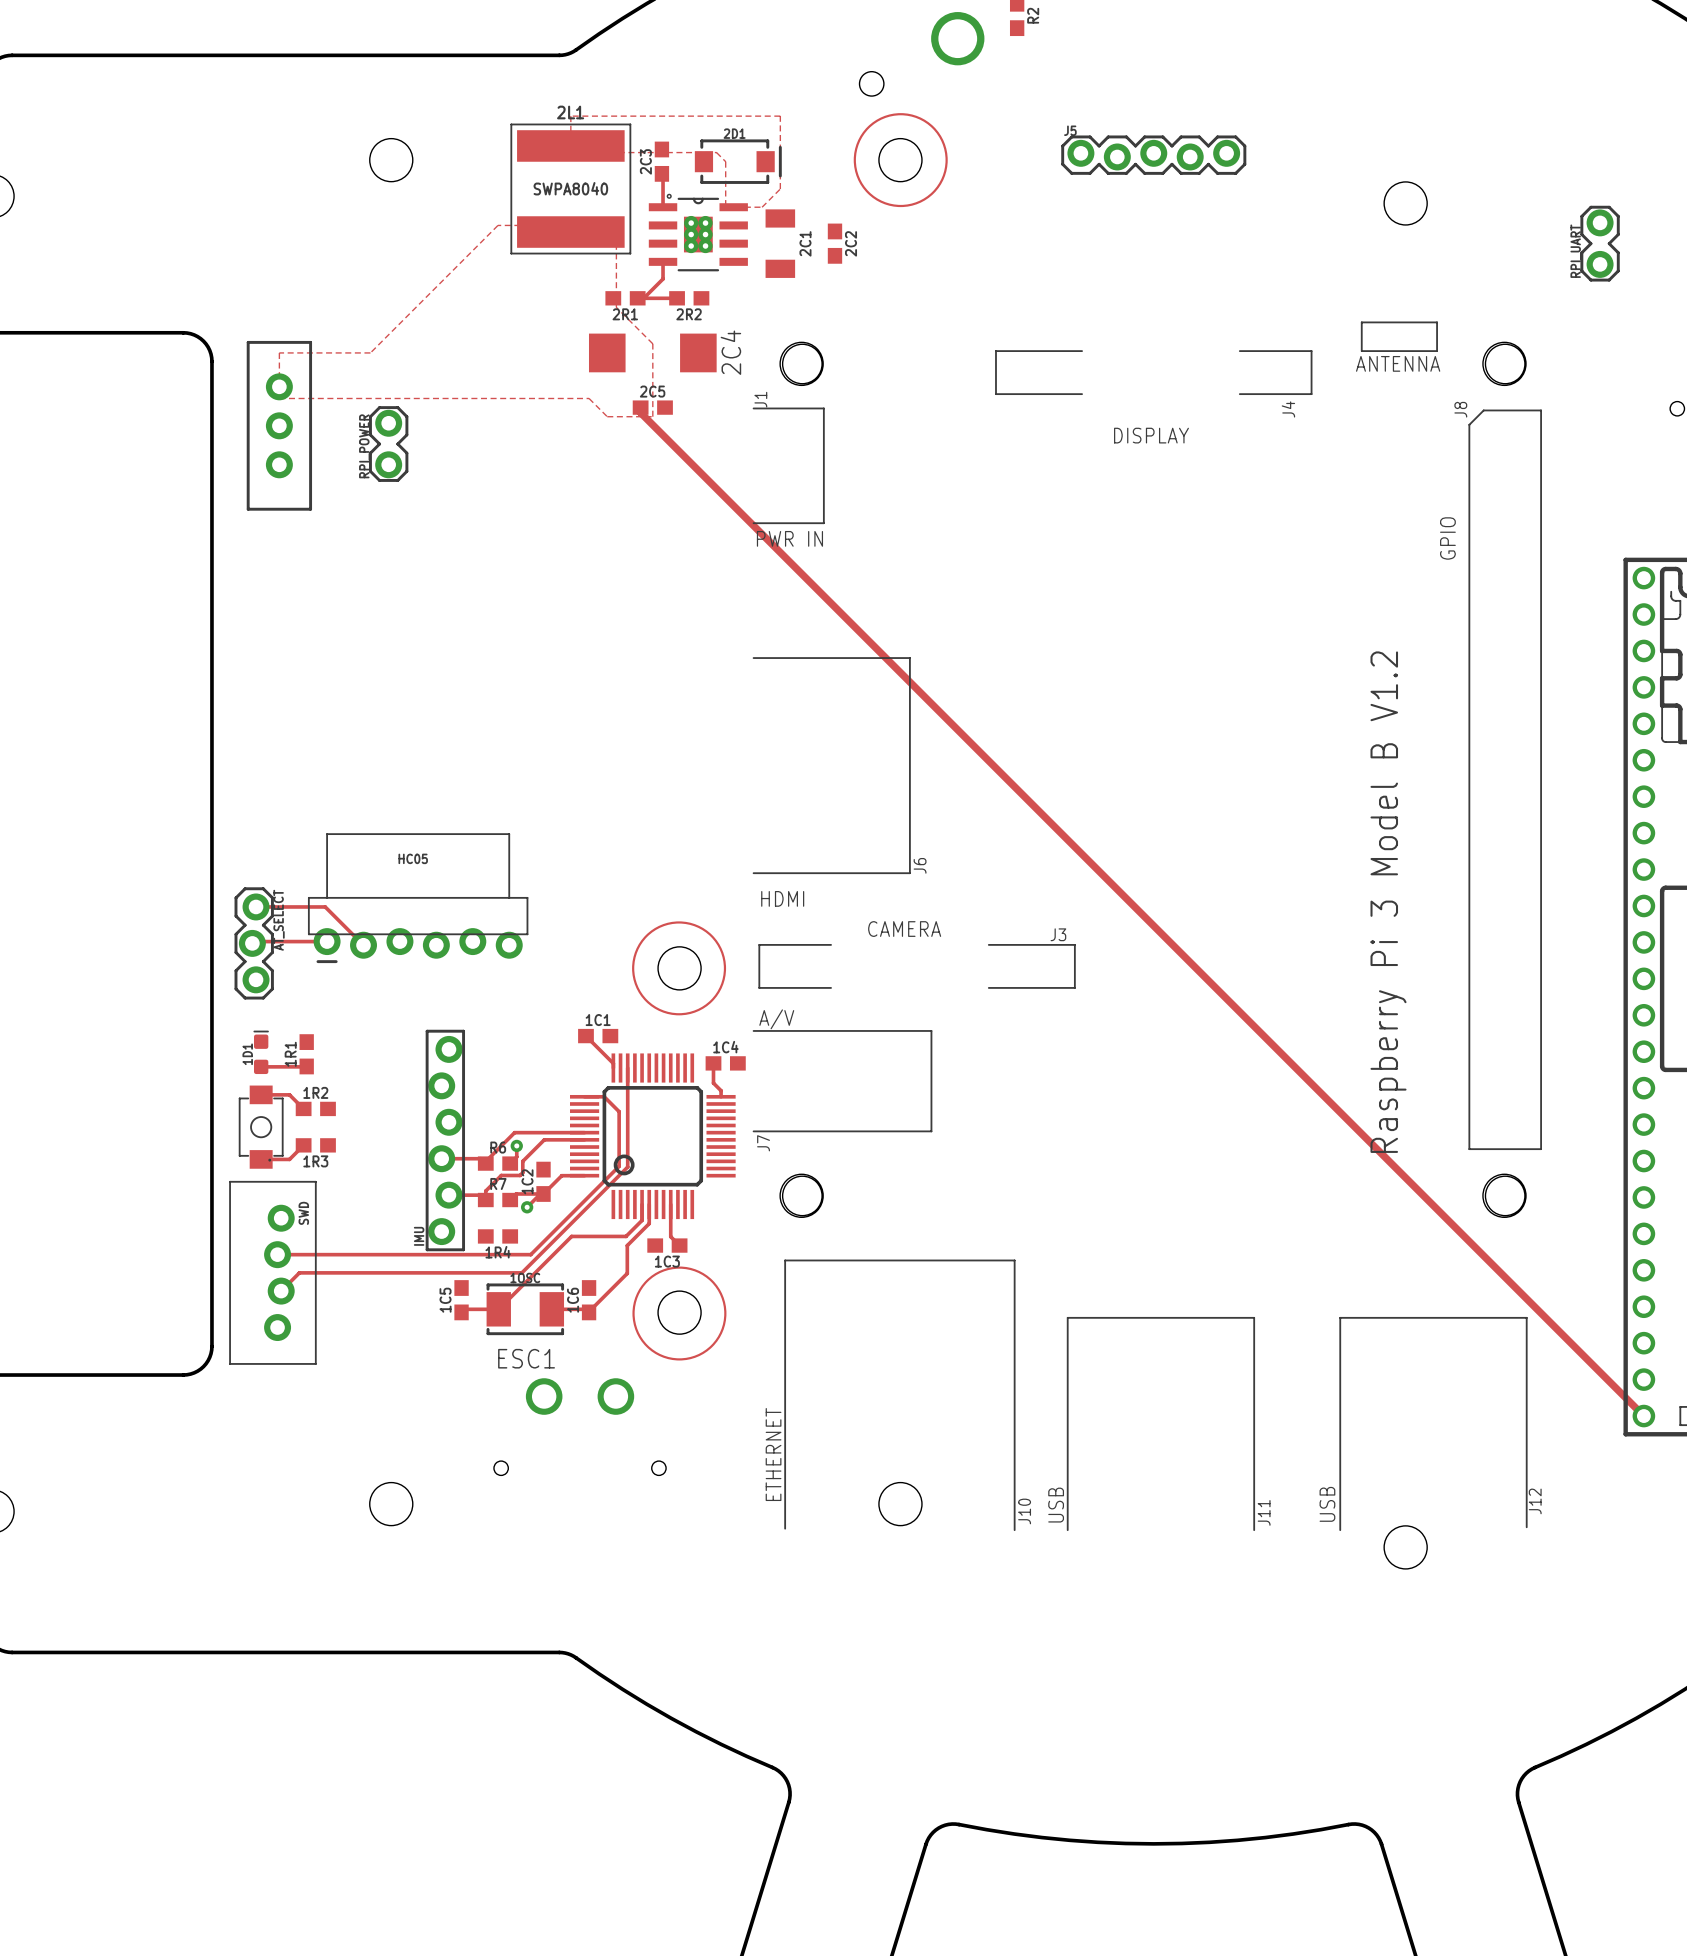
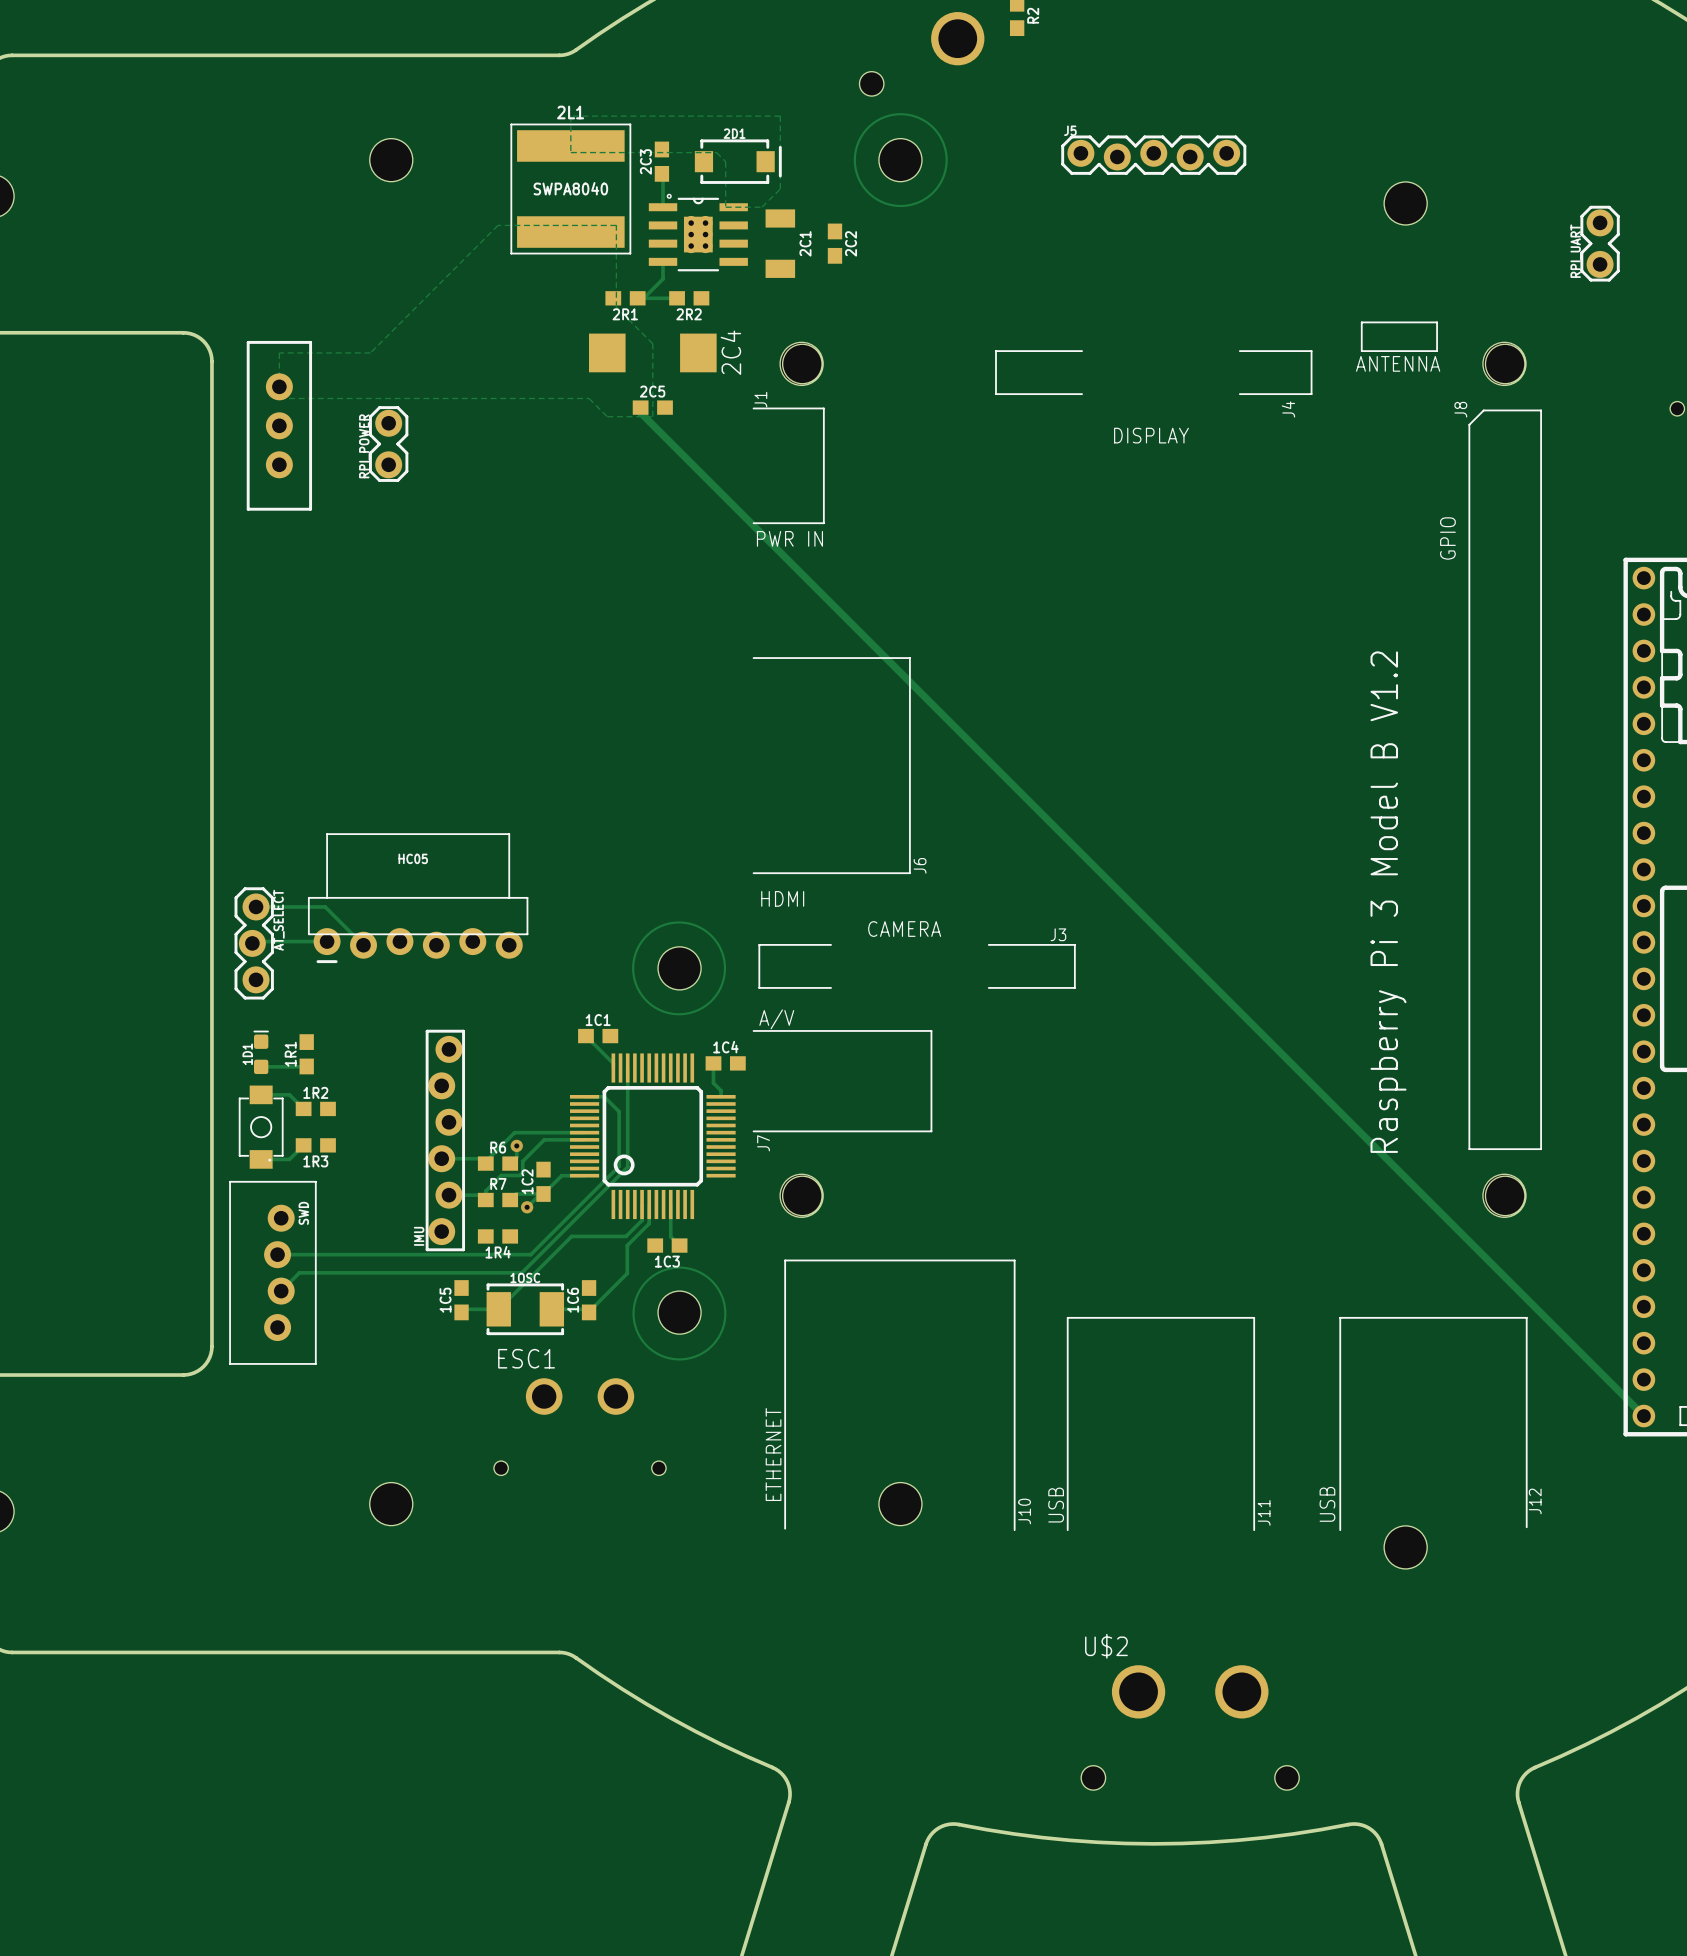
U$2: none -> (1190, 1727)

